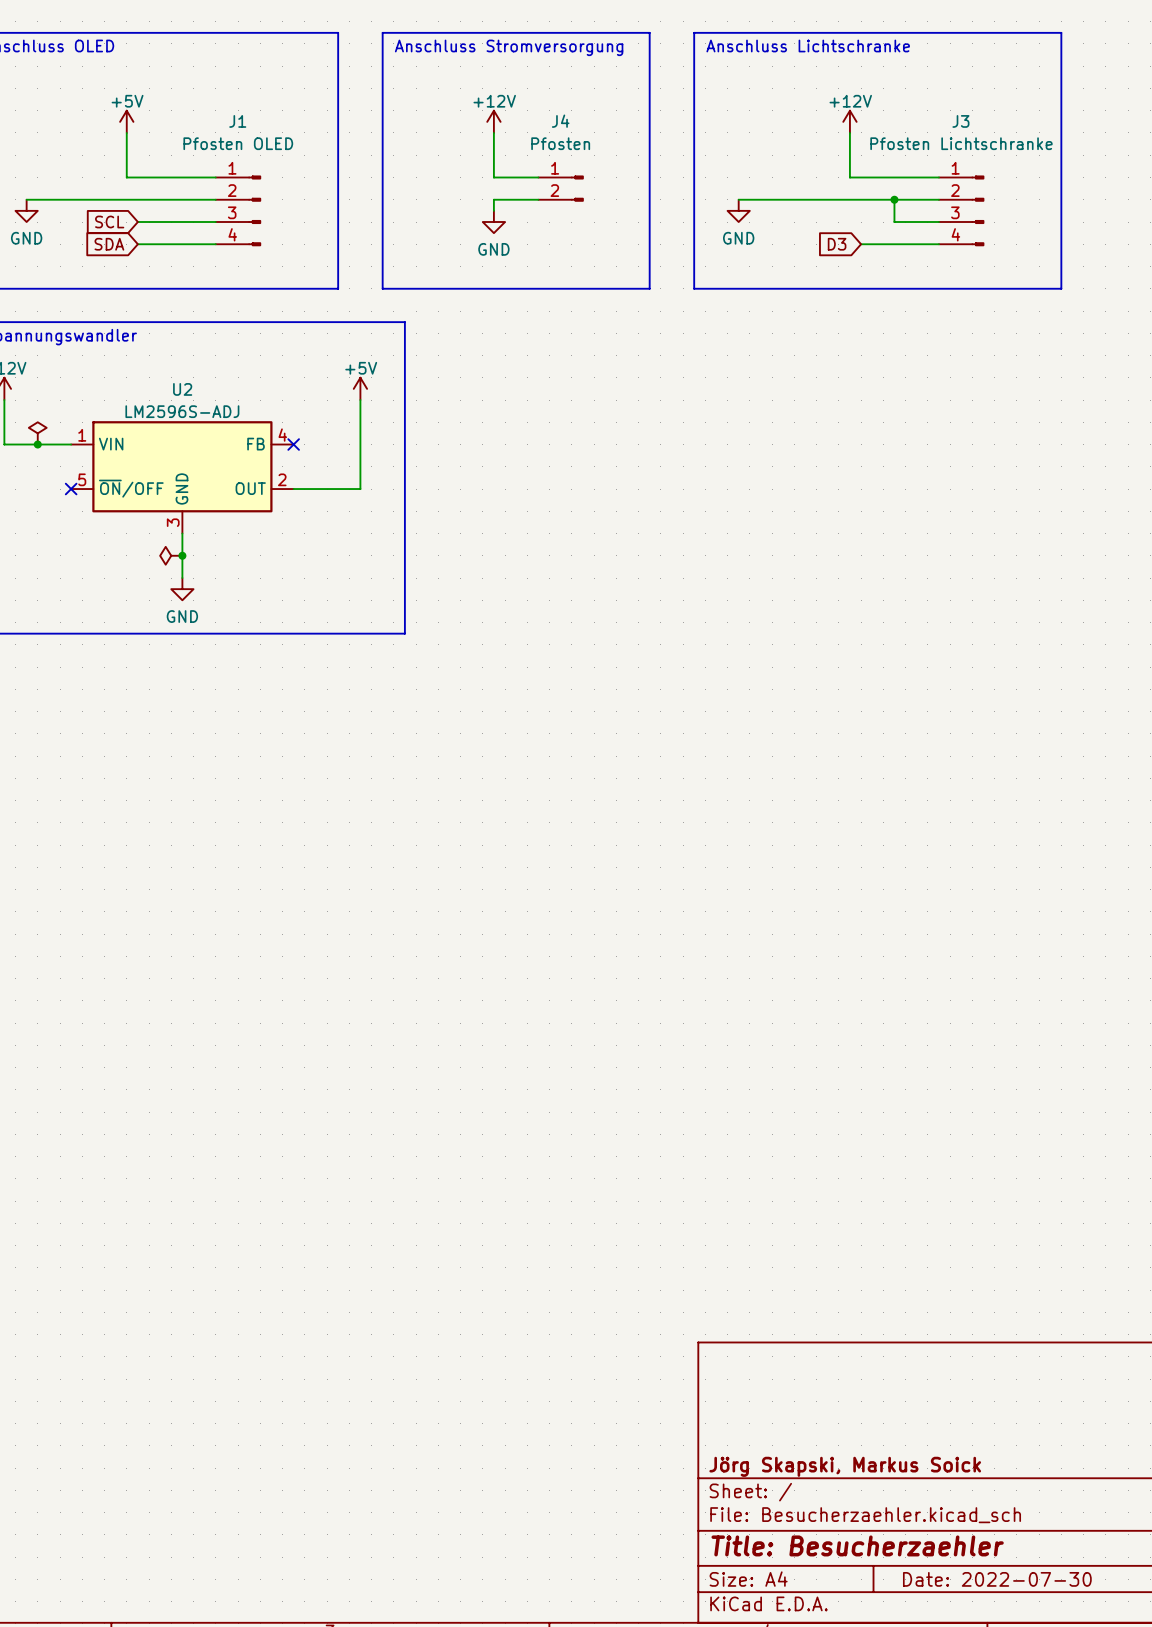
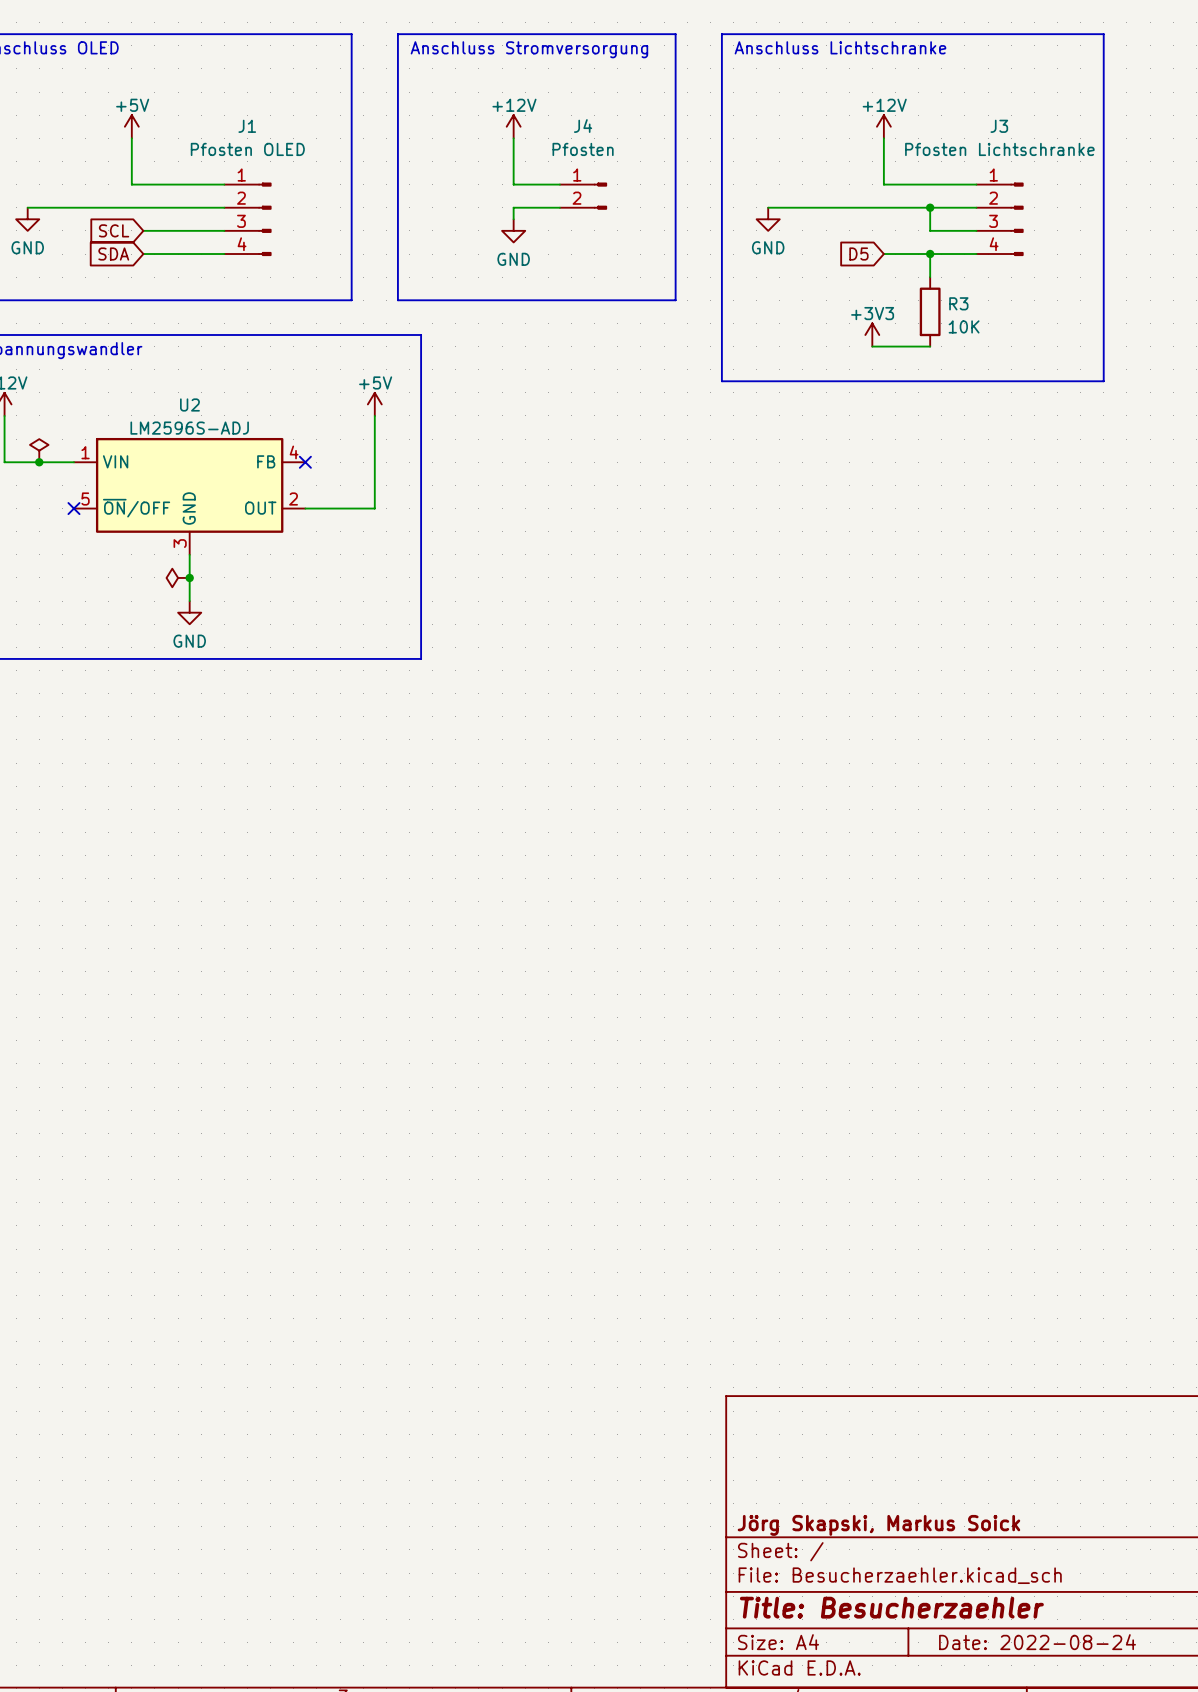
global label: none -> D5 (858, 254)
global label: D3 (837, 244) -> none
wire: none -> (883, 254) (895, 254)
wire: none -> (930, 254) (930, 277)
junction: none -> (930, 254)
line: (694, 288) (1061, 288) -> (721, 300) (721, 381) (1103, 381) (1103, 300)
R3: none -> 10K (930, 311)
power symbol: none -> +3V3 (872, 334)
wire: none -> (872, 346) (930, 346)
title block: Date: 2022-07-30 (997, 1579) -> Date: 2022-08-24 (1037, 1642)

